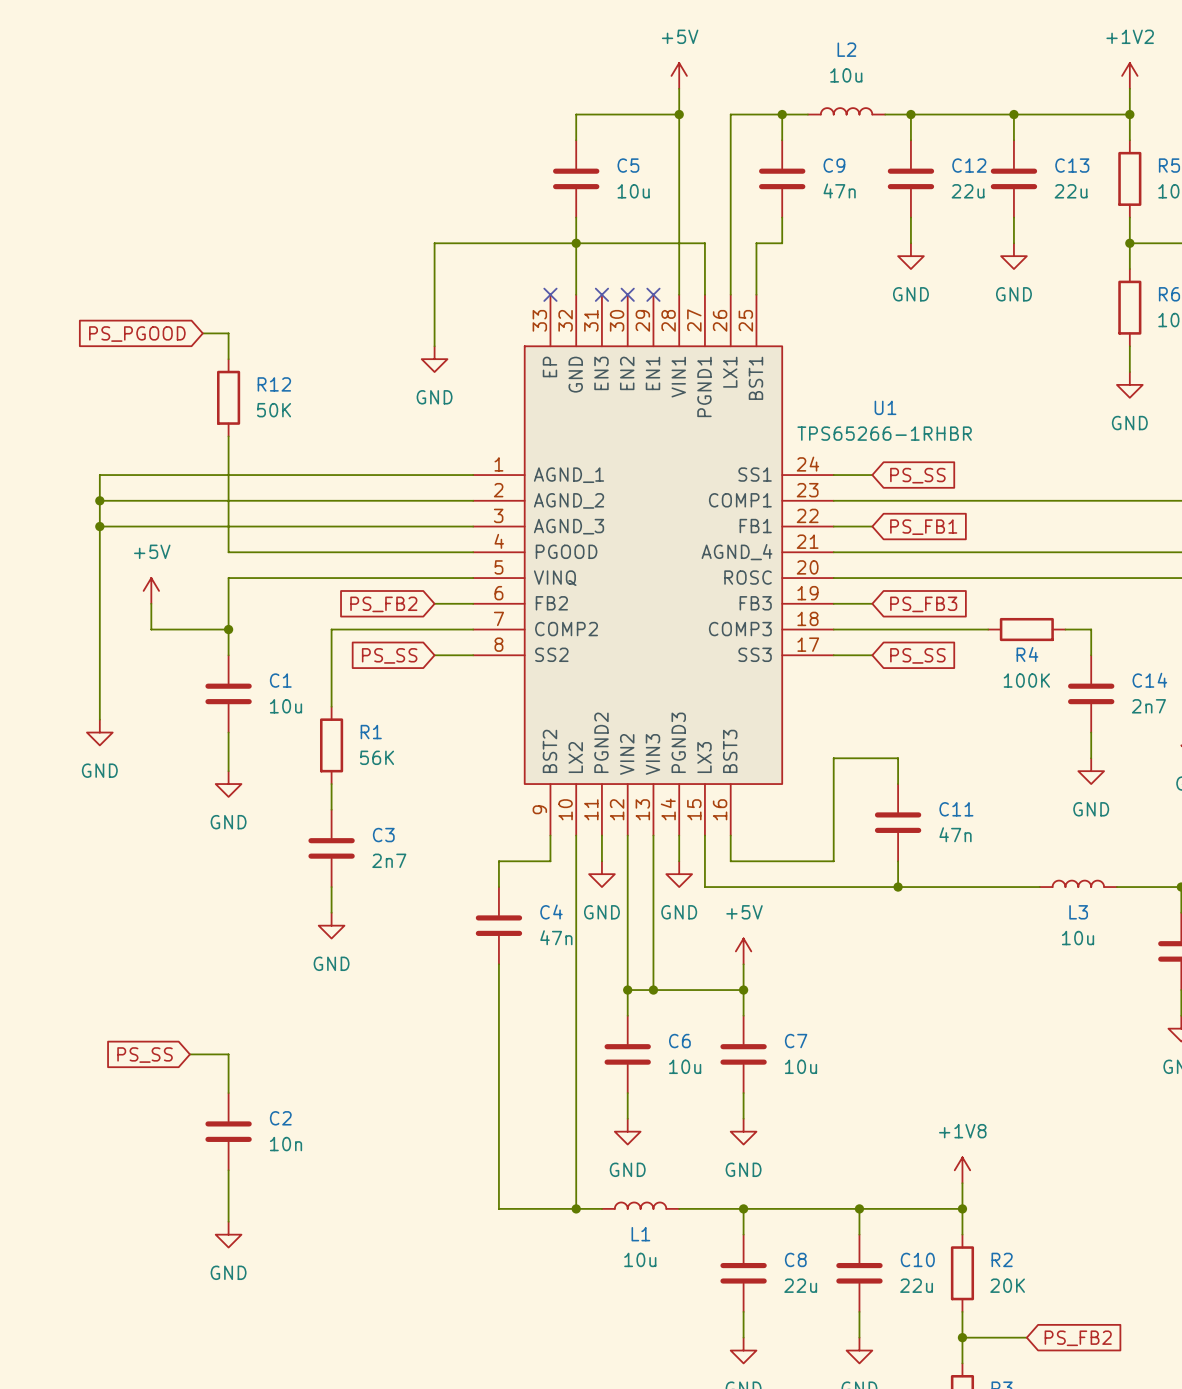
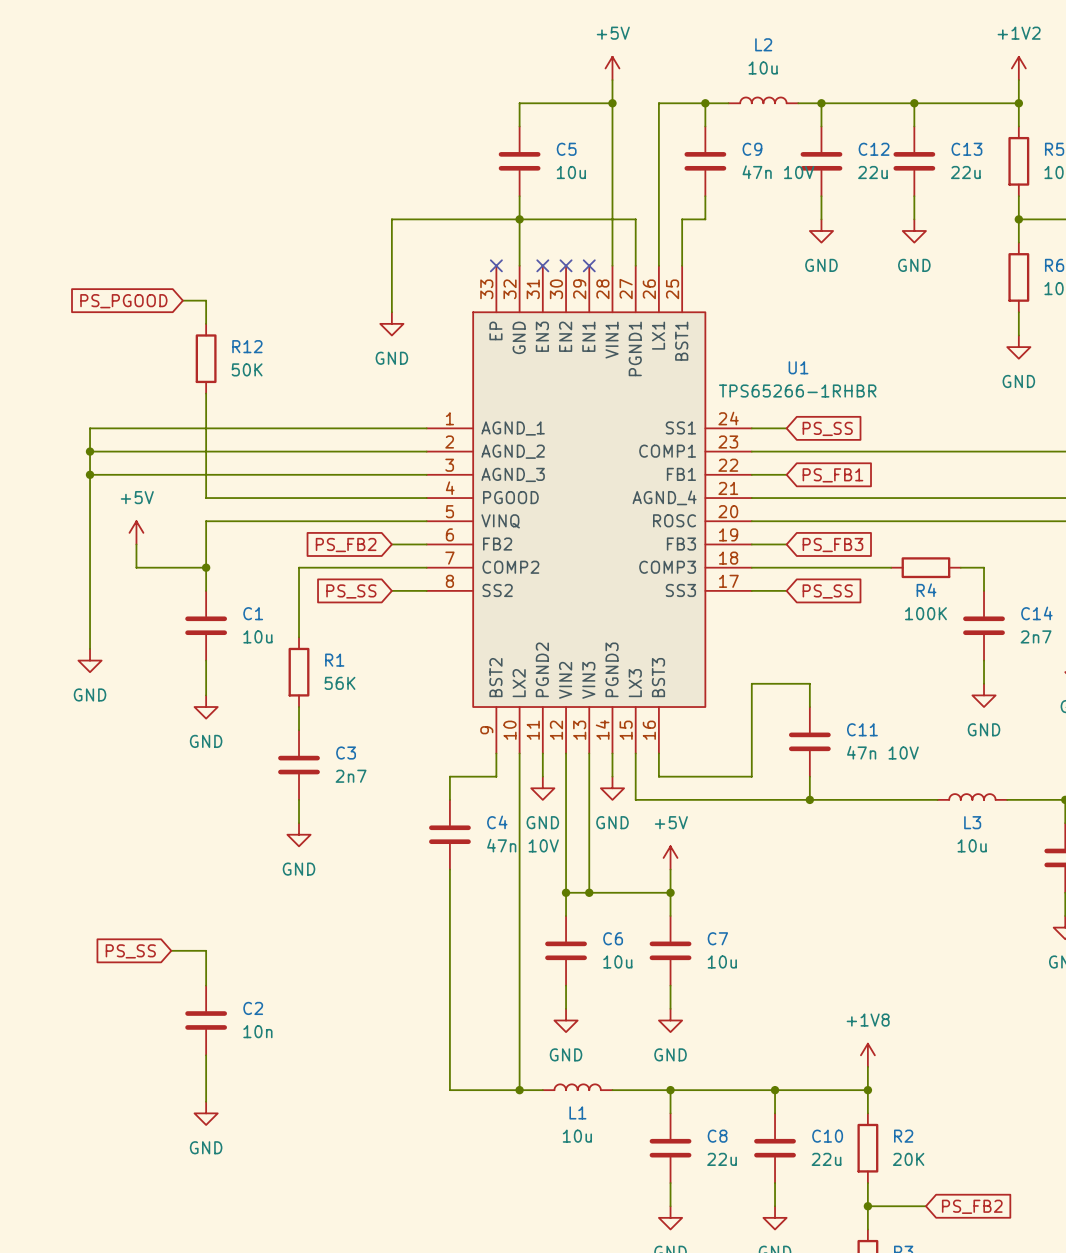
C9 value: 47n (839, 190) -> 47n 10V (778, 172)
C11 value: 47n (955, 834) -> 47n 10V (882, 752)
C4 value: 47n (556, 937) -> 47n 10V (523, 845)

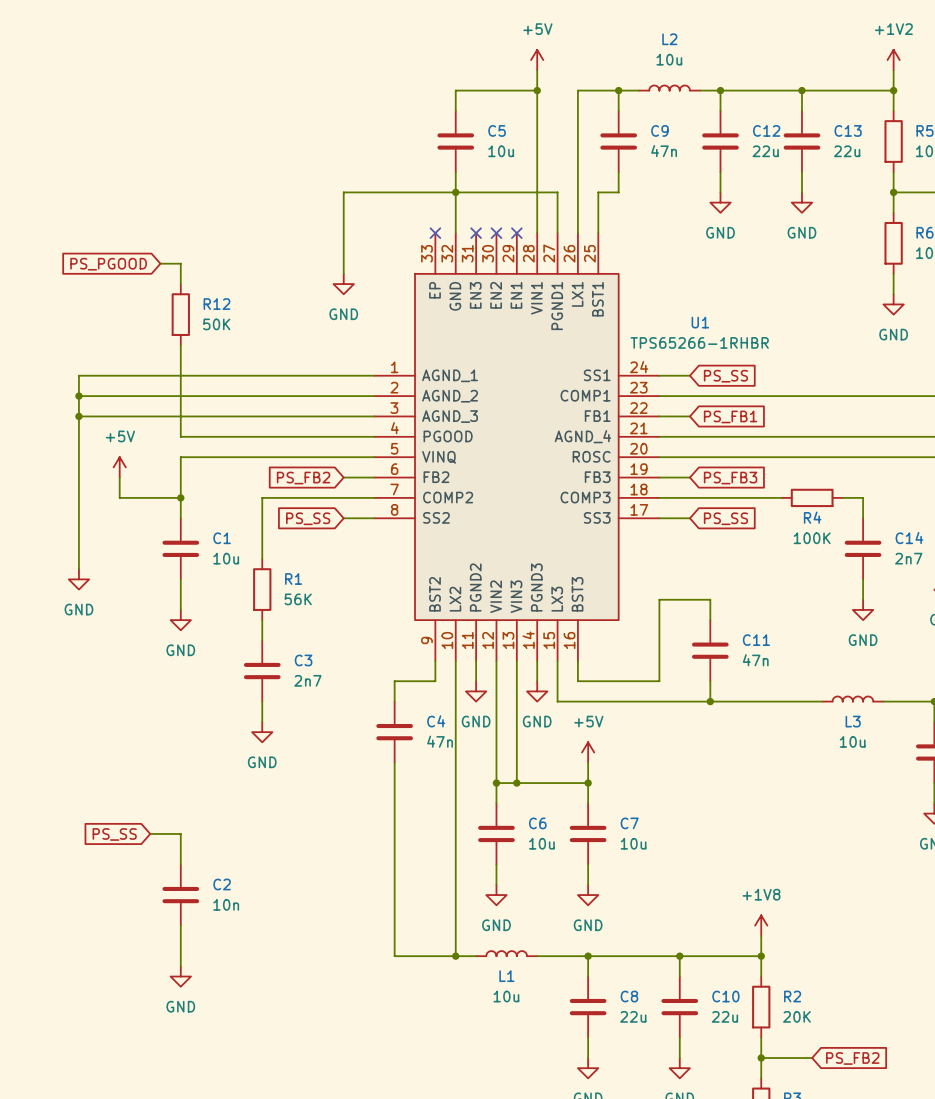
C9 value: 47n 10V (778, 172) -> 47n (664, 151)
C11 value: 47n 10V (882, 752) -> 47n (755, 660)
C4 value: 47n 10V (523, 845) -> 47n (440, 741)

